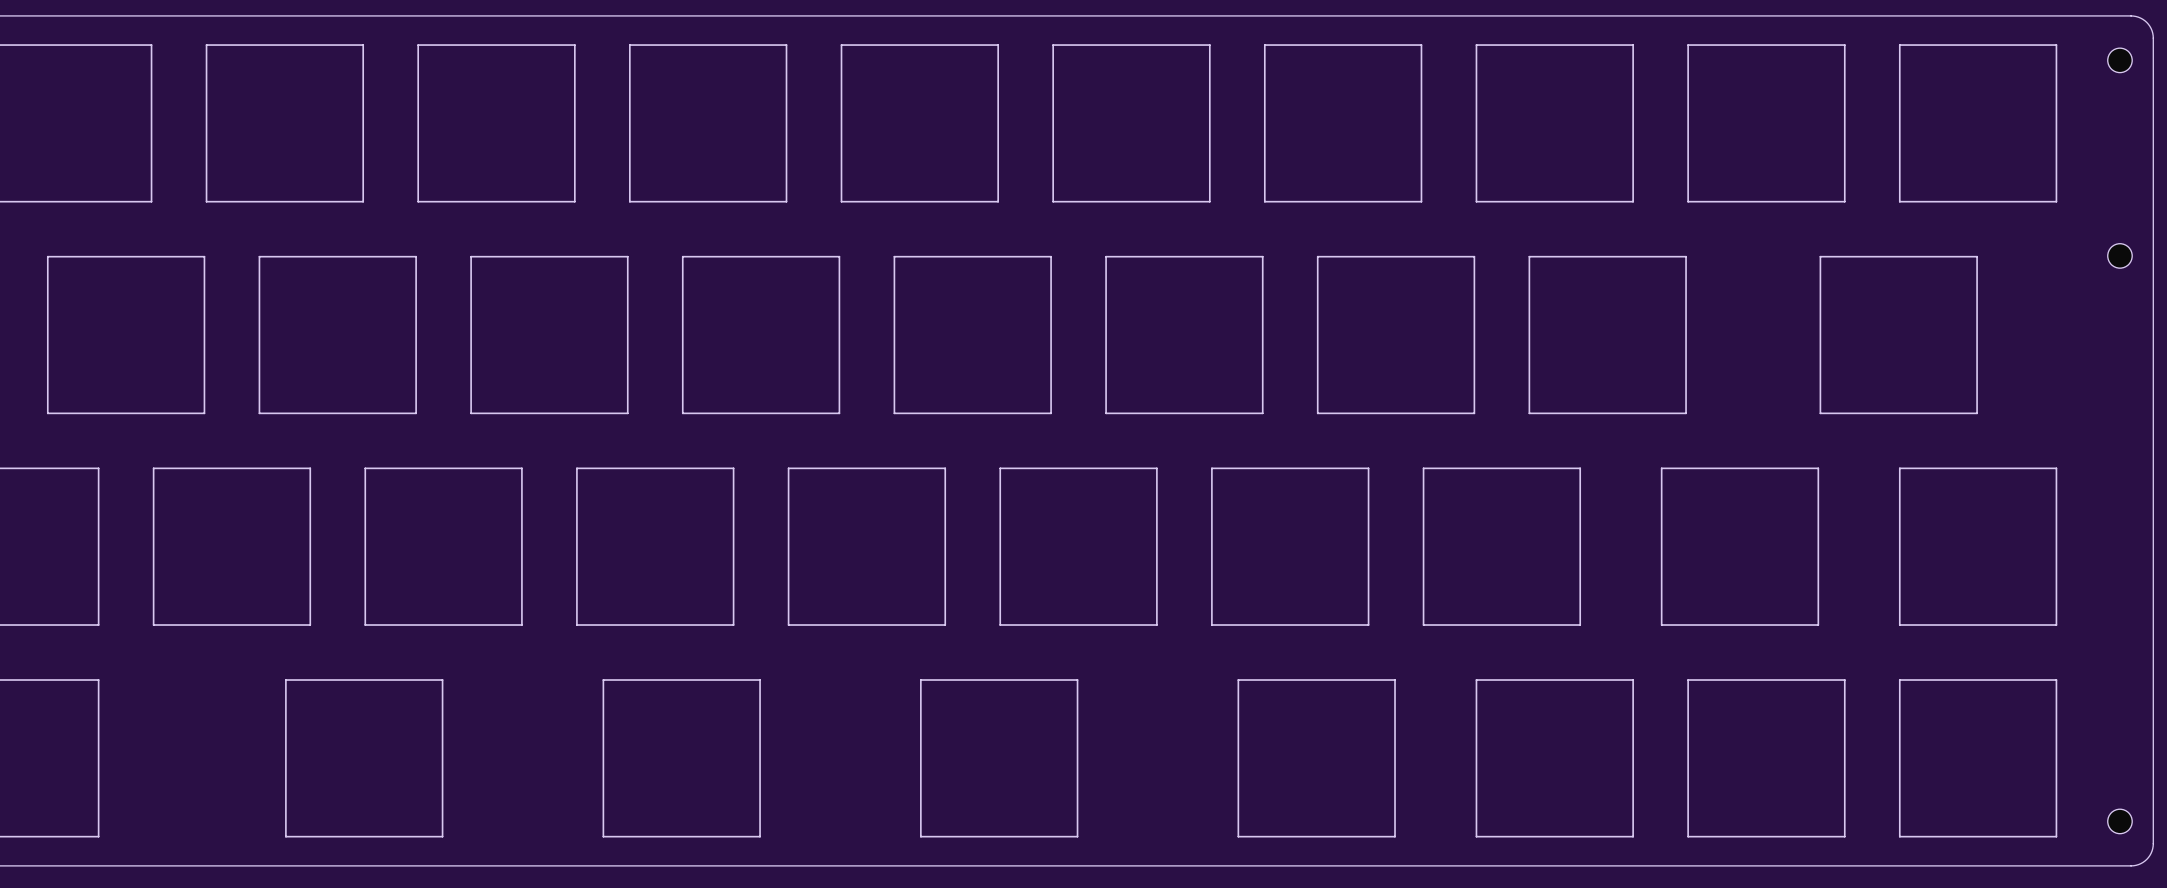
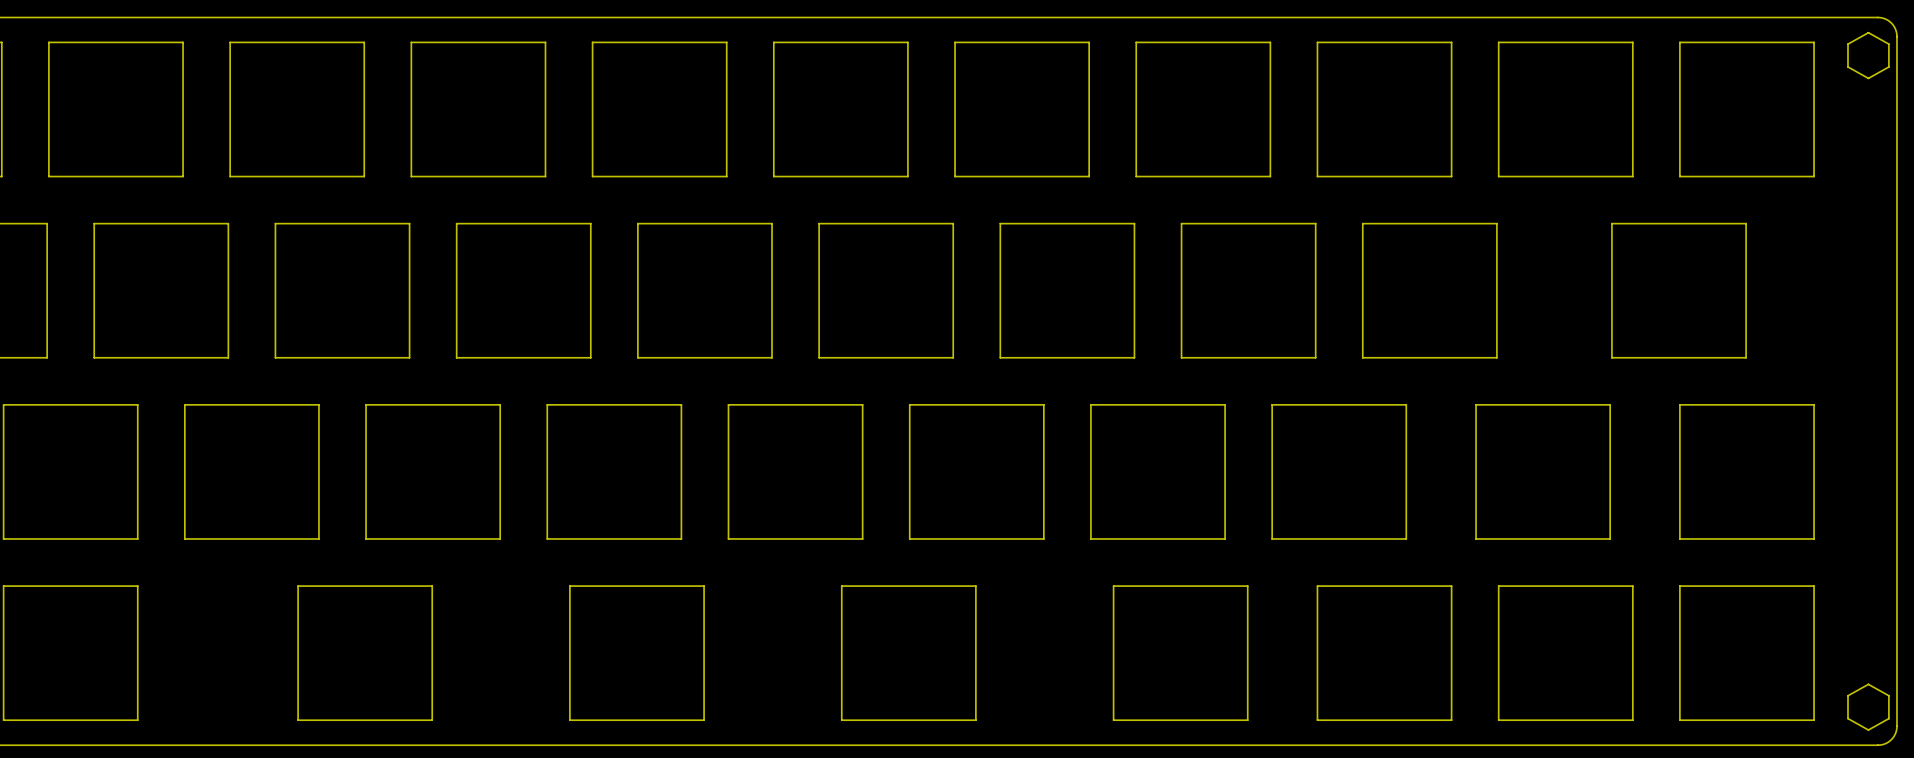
drawing: none -> [1847, 32, 1890, 79]
part: (2119, 60) -> none
part: (2119, 255) -> none
drawing: none -> [1847, 683, 1890, 731]
part: (2119, 821) -> none

